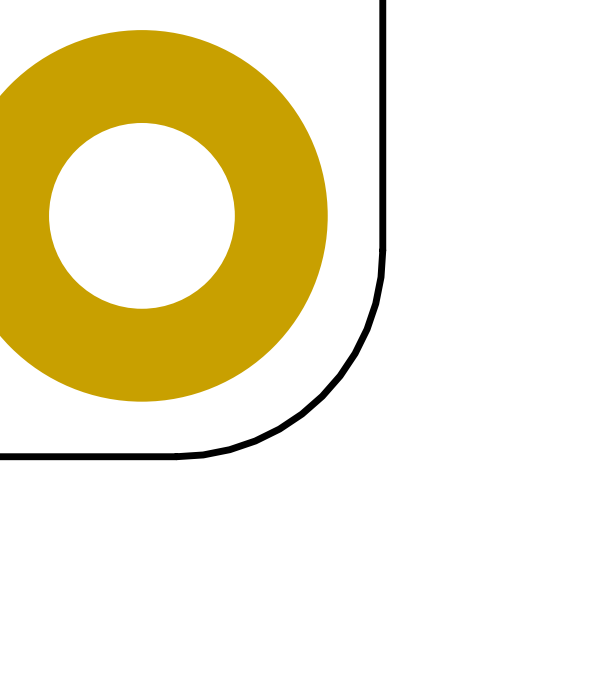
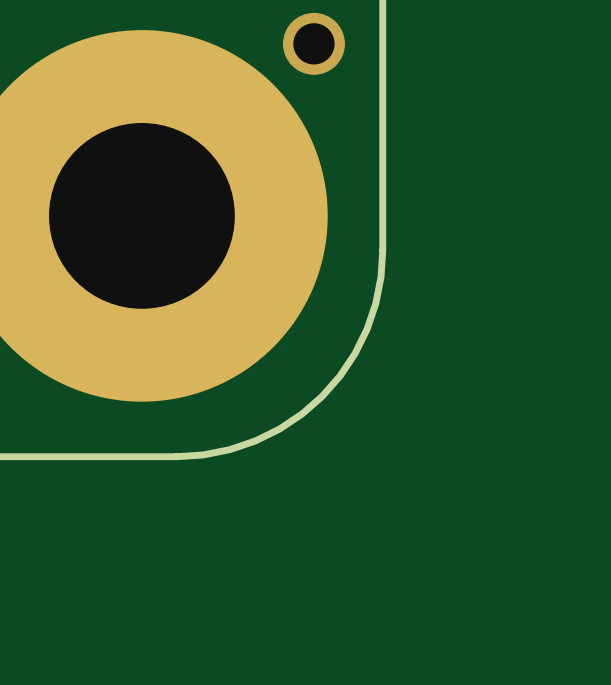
via: none -> (313, 43)

